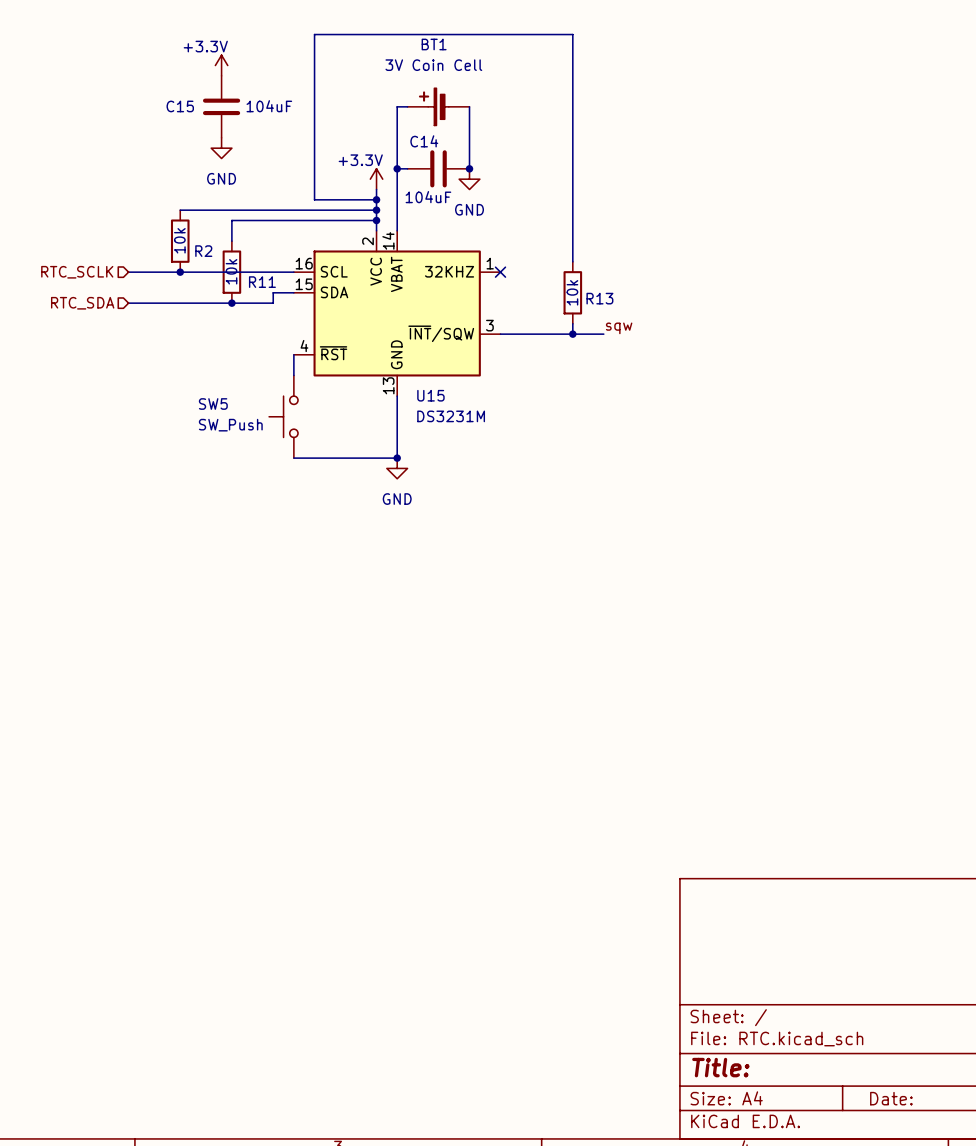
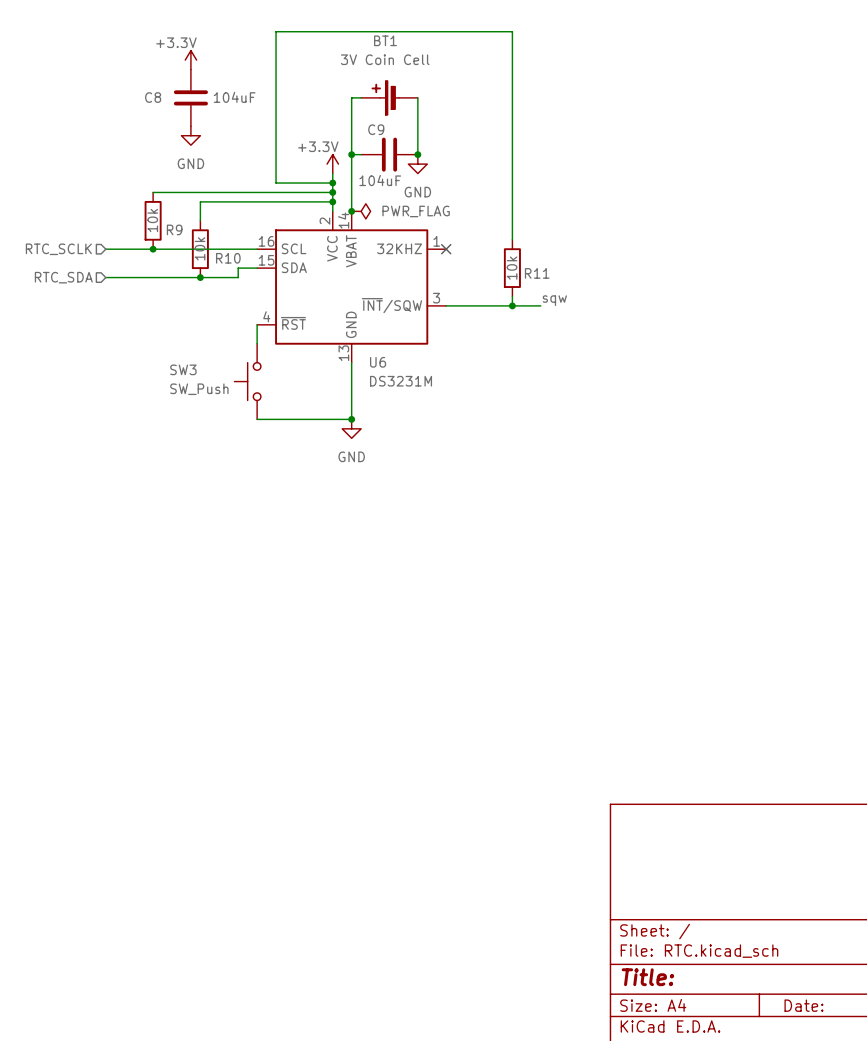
C15 name: C15 (180, 106) -> C8 (153, 97)
C14 name: C14 (424, 141) -> C9 (376, 129)
junction: none -> (351, 211)
power symbol: none -> PWR_FLAG (361, 211)
R2 name: R2 (203, 251) -> R9 (174, 229)
R11 name: R11 (262, 282) -> R10 (228, 258)
R13 name: R13 (599, 298) -> R11 (537, 273)
U15 name: U15 (430, 395) -> U6 (378, 362)
SW5 name: SW5 (213, 404) -> SW3 (183, 369)

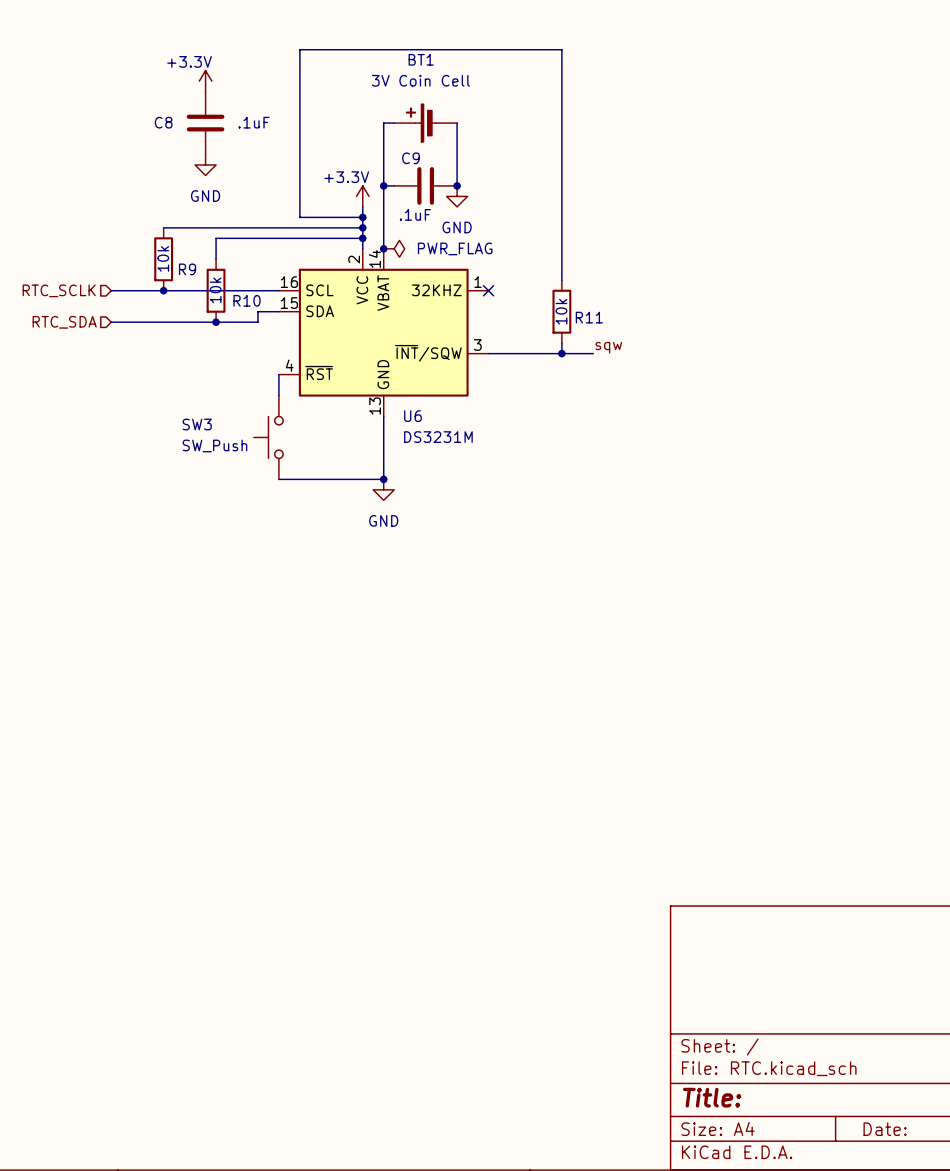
C8 value: 104uF (234, 97) -> .1uF (254, 122)
C9 value: 104uF (380, 180) -> .1uF (415, 214)

